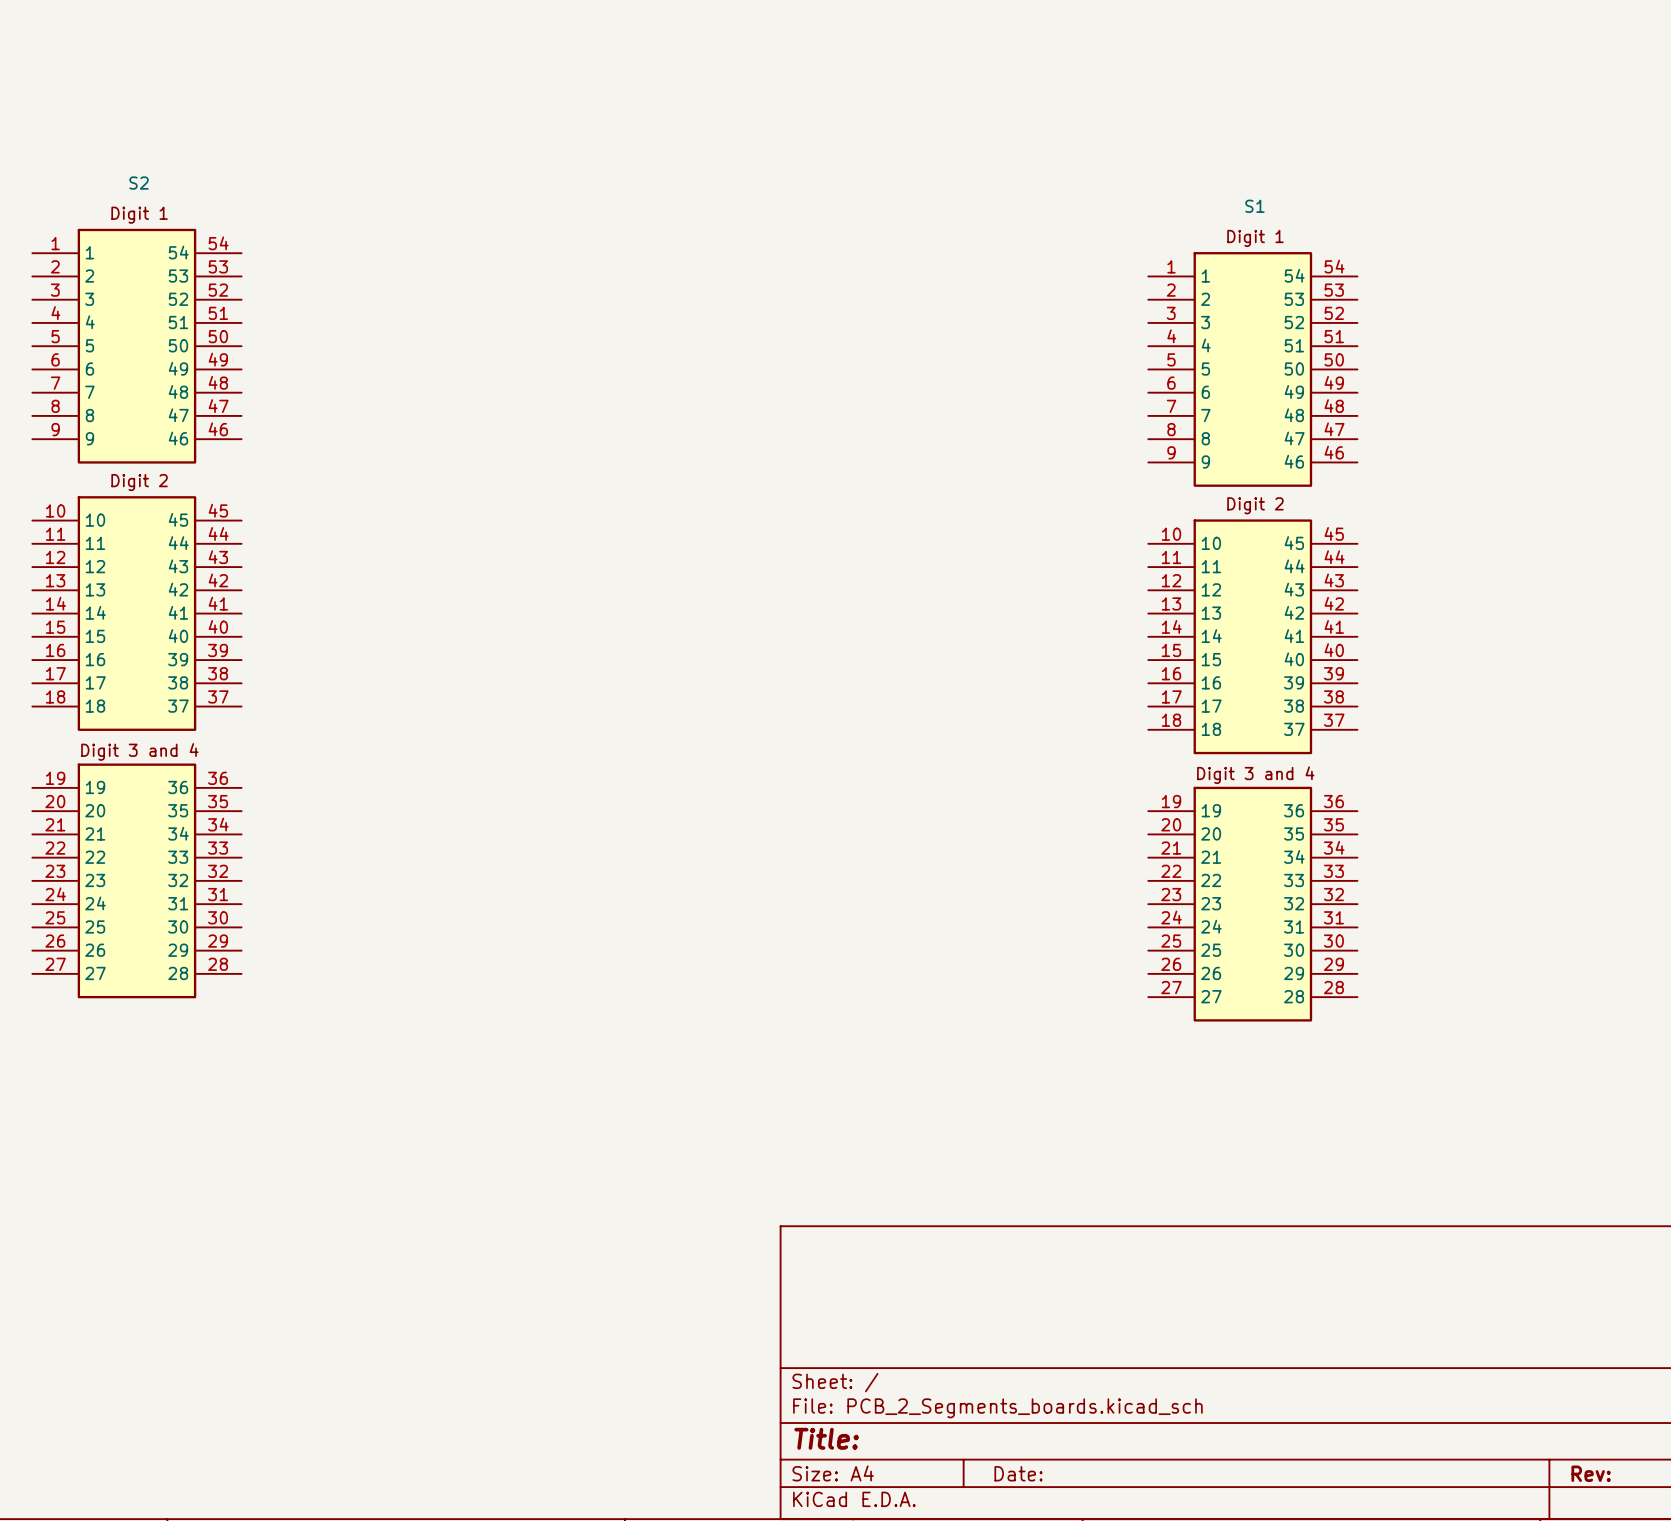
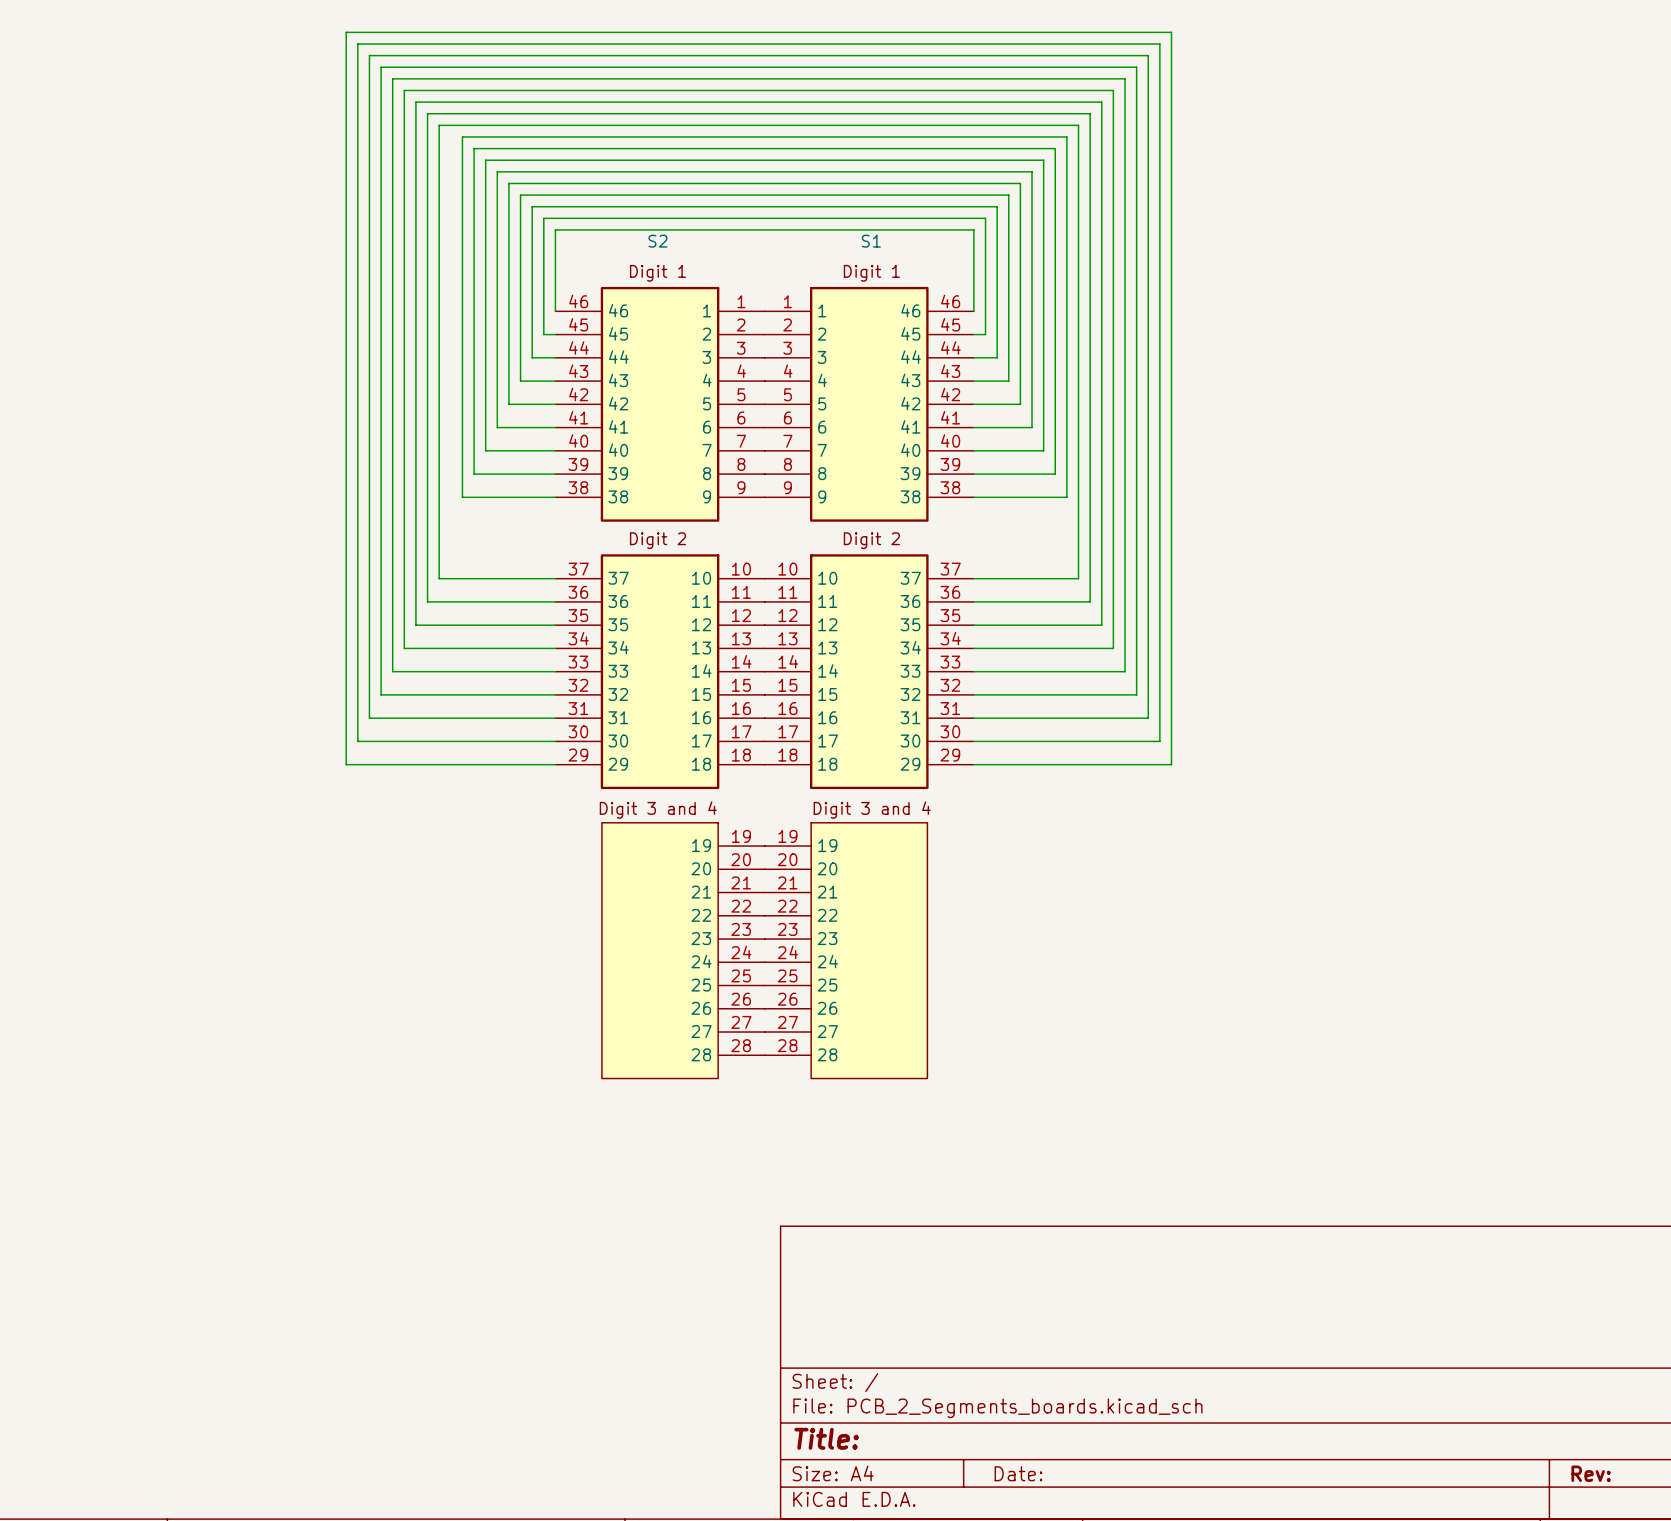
S2 symbol: [32, 228, 242, 999] -> [555, 286, 765, 1079]
S1 symbol: [1148, 252, 1358, 1022] -> [764, 286, 974, 1079]
wire: none -> (555, 311) (555, 229) (973, 229) (973, 311)
wire: none -> (555, 334) (543, 334) (543, 218) (985, 218) (985, 334) (973, 334)
wire: none -> (555, 357) (532, 357) (532, 206) (997, 206) (997, 357) (973, 357)
wire: none -> (555, 381) (520, 381) (520, 195) (1008, 195) (1008, 381) (973, 381)
wire: none -> (555, 404) (508, 404) (508, 183) (1020, 183) (1020, 404) (973, 404)
wire: none -> (555, 427) (497, 427) (497, 171) (1032, 171) (1032, 427) (973, 427)
wire: none -> (555, 450) (485, 450) (485, 160) (1043, 160) (1043, 450) (973, 450)
wire: none -> (555, 474) (474, 474) (474, 148) (1055, 148) (1055, 474) (973, 474)
wire: none -> (555, 497) (462, 497) (462, 136) (1066, 136) (1066, 497) (973, 497)
wire: none -> (555, 578) (439, 578) (439, 125) (1078, 125) (1078, 578) (973, 578)
wire: none -> (555, 601) (427, 601) (427, 113) (1090, 113) (1090, 601) (973, 601)
wire: none -> (555, 625) (415, 625) (415, 102) (1101, 102) (1101, 625) (973, 625)
wire: none -> (555, 648) (404, 648) (404, 90) (1113, 90) (1113, 648) (973, 648)
wire: none -> (555, 671) (392, 671) (392, 78) (1125, 78) (1125, 671) (973, 671)
wire: none -> (555, 694) (381, 694) (381, 67) (1136, 67) (1136, 694) (973, 694)
wire: none -> (555, 718) (369, 718) (369, 55) (1148, 55) (1148, 718) (973, 718)
wire: none -> (555, 741) (357, 741) (357, 43) (1159, 43) (1159, 741) (973, 741)
wire: none -> (555, 764) (346, 764) (346, 32) (1171, 32) (1171, 764) (973, 764)

